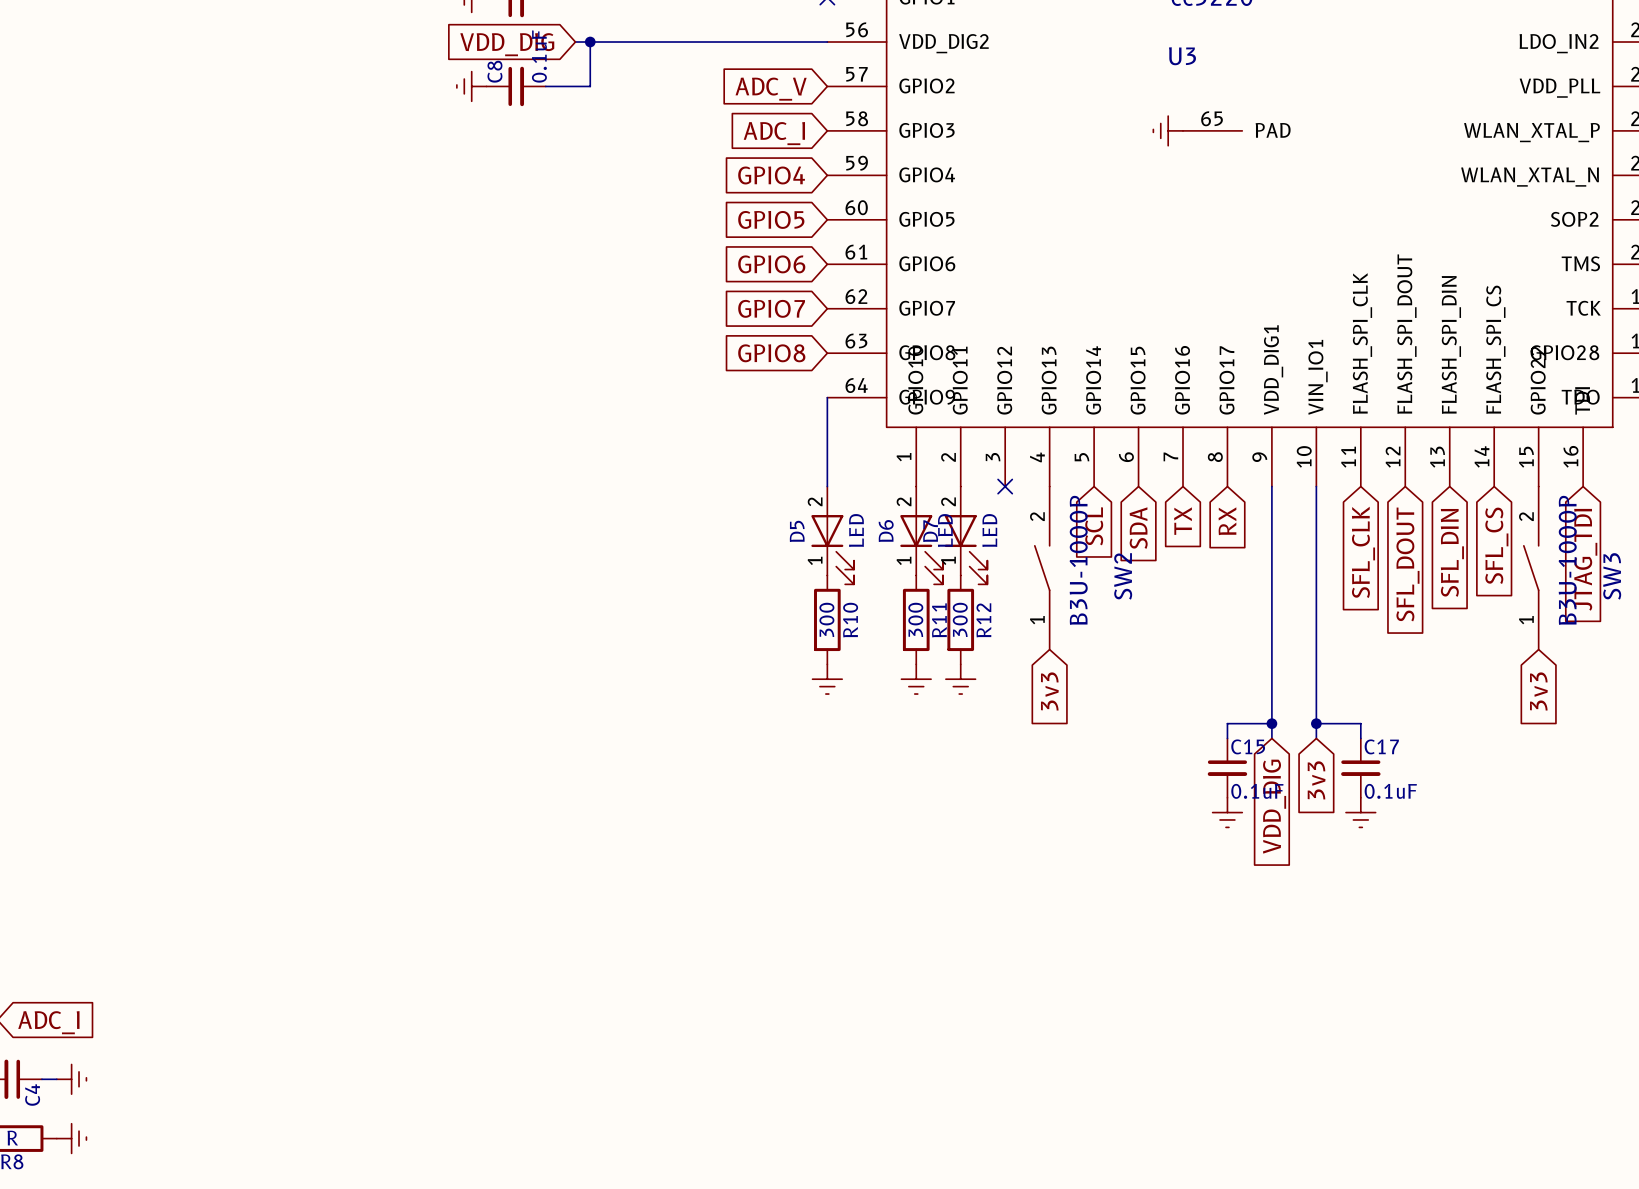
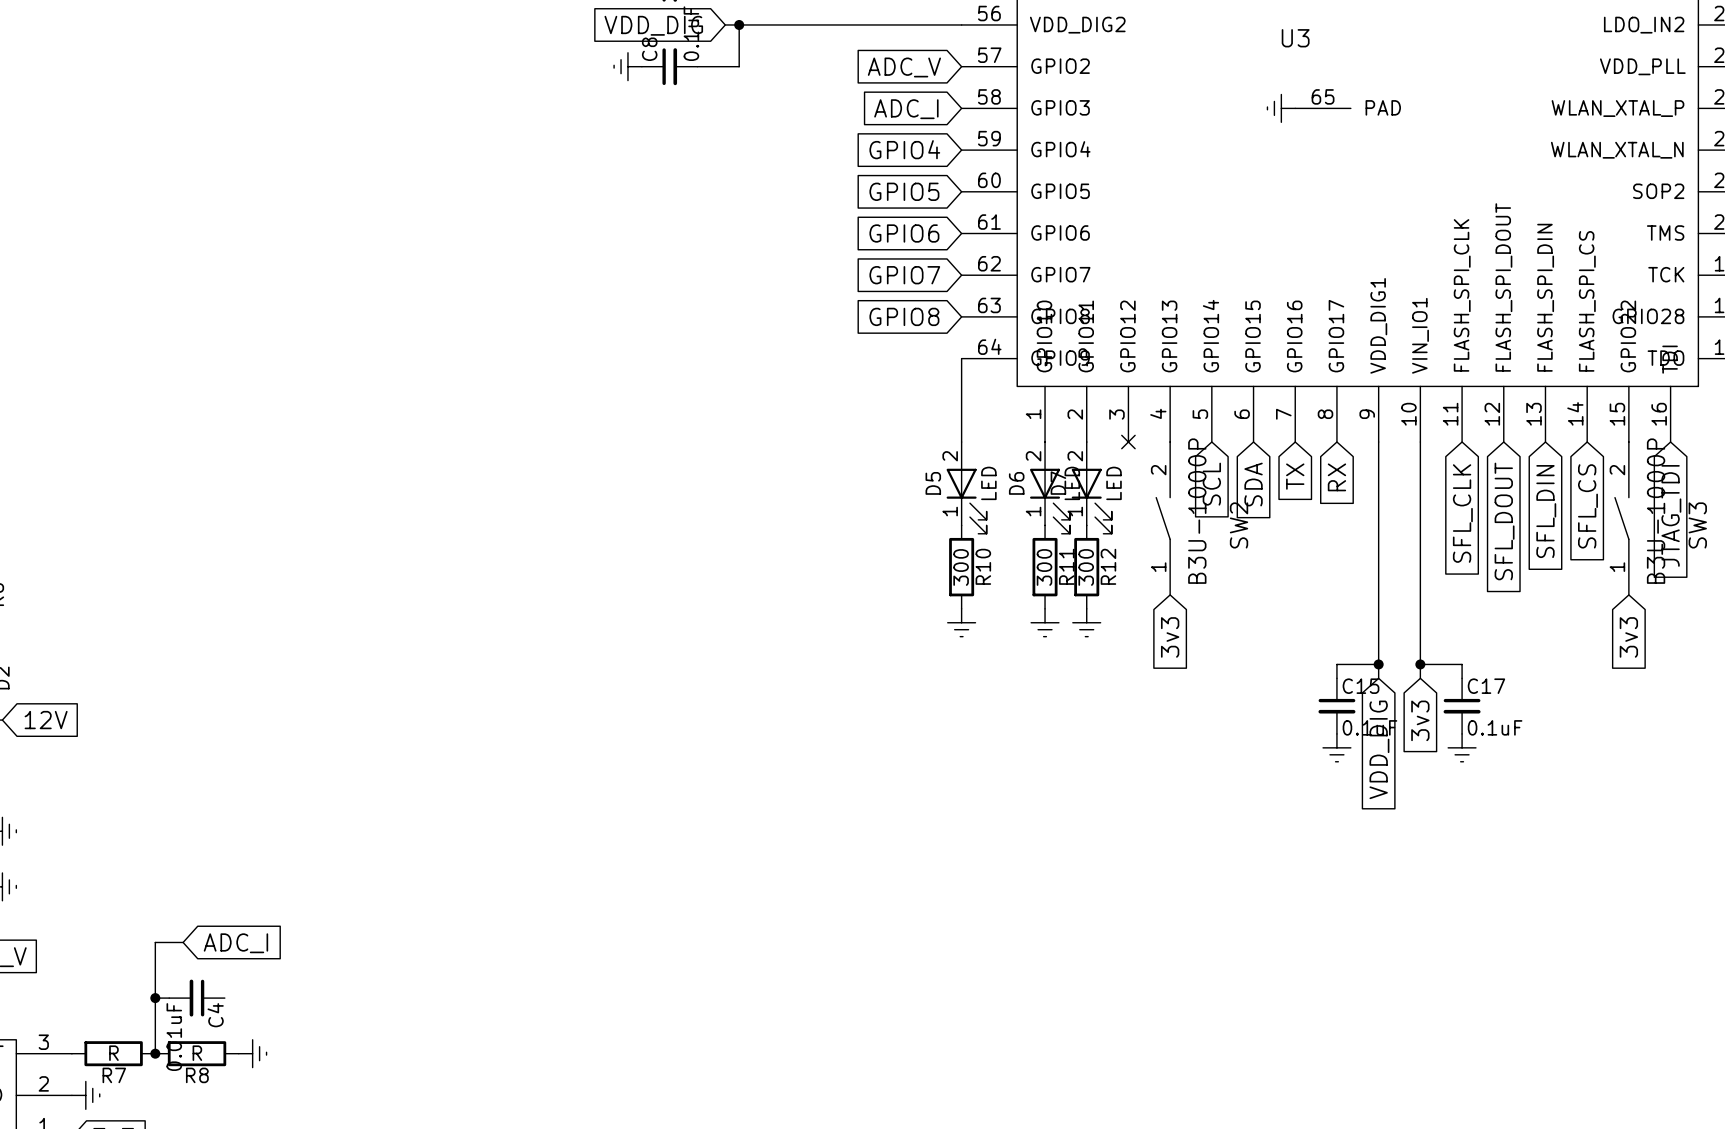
wire: (41, 1079) (56, 1079) -> none
power symbol: (71, 1079) -> none

